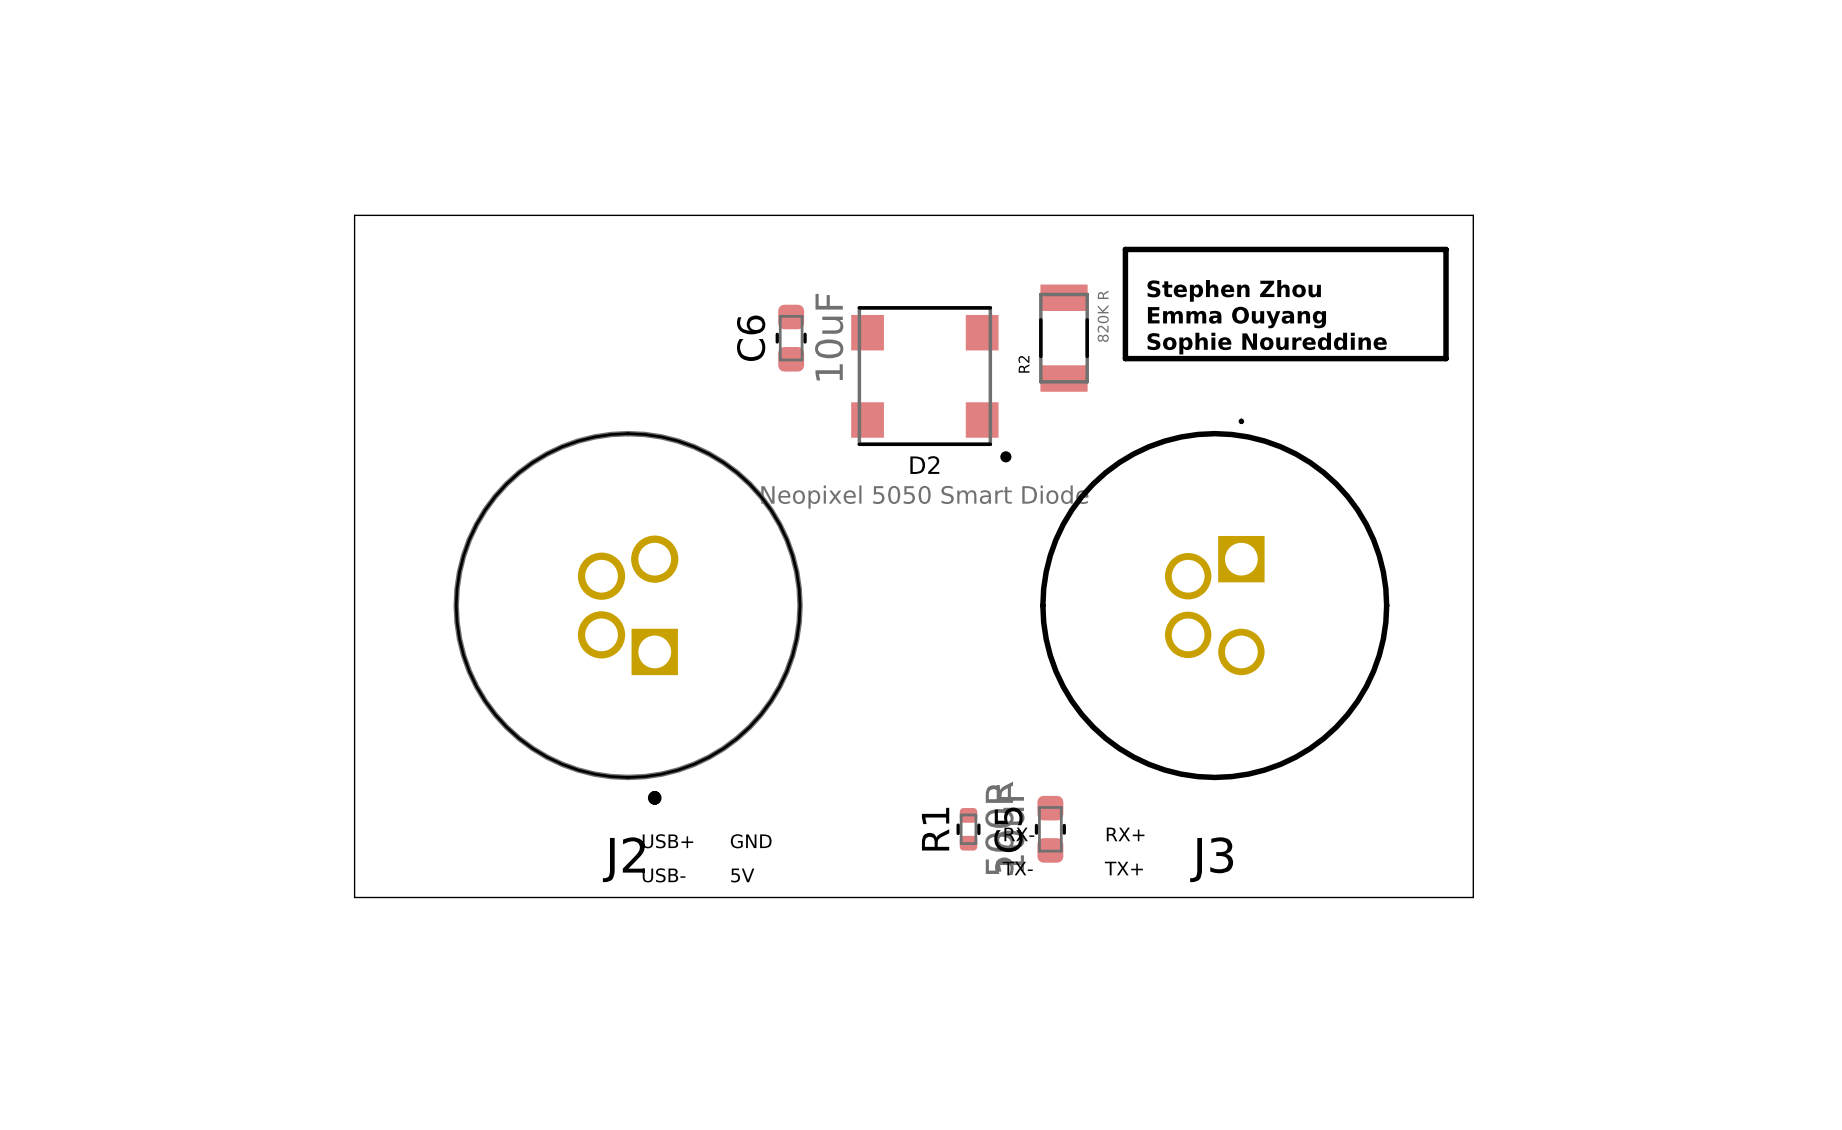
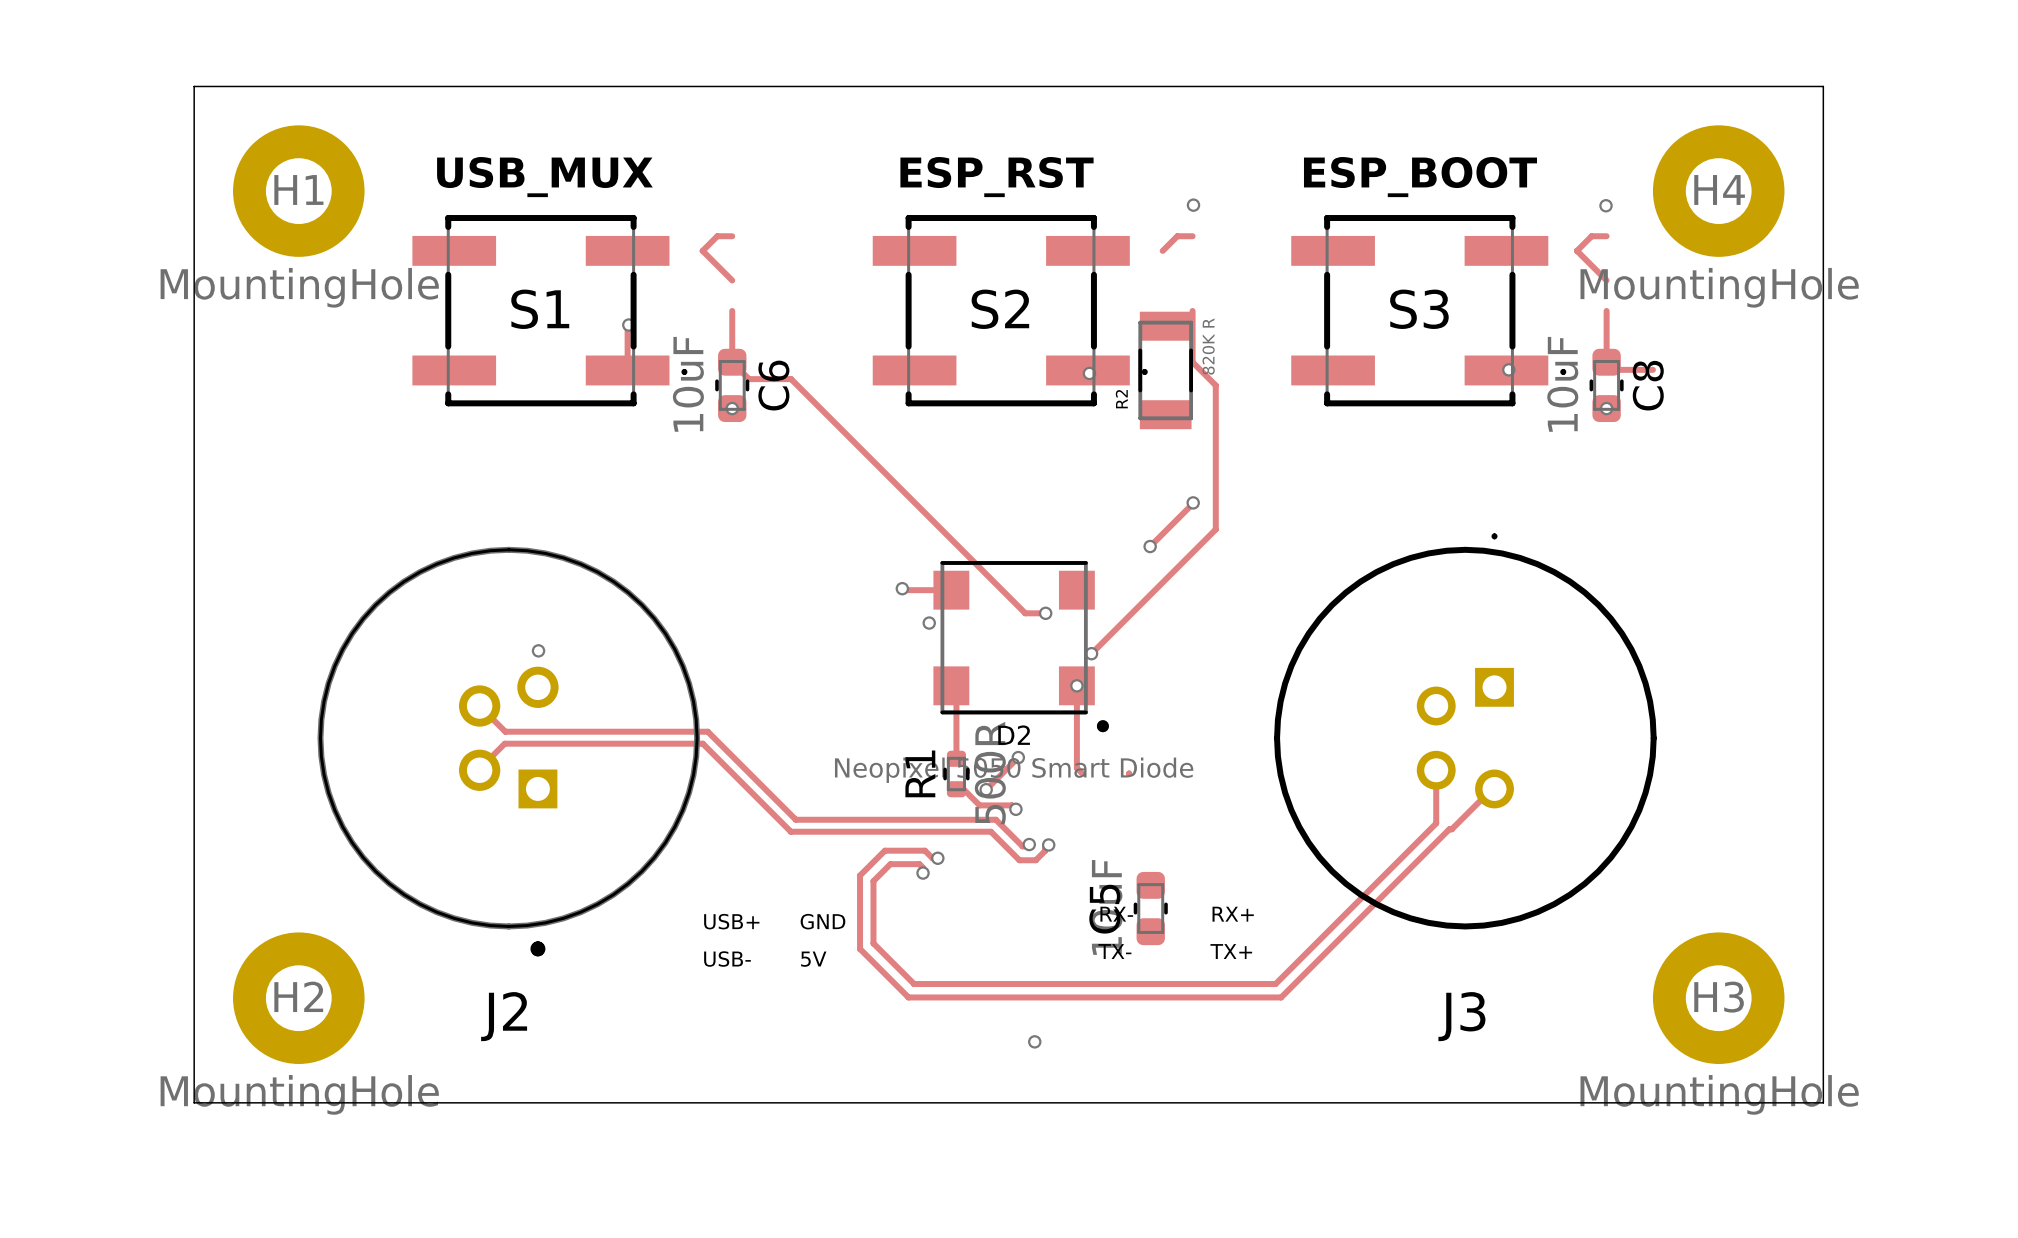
text: none -> USB_MUX (544, 177)
text: none -> ESP_RST (997, 177)
text: none -> ESP_BOOT (1420, 177)
H1: none -> MountingHole (298, 191)
H4: none -> MountingHole (1718, 191)
via: none -> (1193, 205)
via: none -> (1606, 205)
board edge: (354, 215) (1473, 215) (1473, 897) (354, 897) (354, 215) -> (194, 86) (194, 1102) (1823, 1102) (1823, 86) (194, 86)
track: none -> (732, 236) (717, 236) (702, 250) (732, 280)
track: none -> (1192, 236) (1177, 236) (1162, 250)
track: none -> (1606, 236) (1591, 236) (1577, 250) (1606, 280)
line: (1125, 249) (1446, 249) (1446, 358) (1125, 358) (1125, 249) -> none
S1: none -> (549, 310)
track: none -> (732, 310) (732, 362) (749, 379) (791, 379) (1025, 613) (1045, 613)
S2: none -> (1010, 310)
track: none -> (1192, 310) (1192, 362) (1215, 385) (1215, 529) (1091, 653)
S3: none -> (1428, 310)
track: none -> (1606, 310) (1606, 362) (1614, 369) (1652, 369)
text: Stephen Zhou (1234, 290) -> none
track: none -> (628, 325) (627, 370)
via: none -> (628, 325)
text: Emma Ouyang (1236, 317) -> none
C6 value position: 10uF (829, 337) -> 10uF (688, 384)
via: none -> (1508, 369)
C6 name position: C6 (751, 338) -> C6 (773, 385)
C6 position: (791, 338) -> (732, 385)
via: none -> (1089, 373)
text: Sophie Noureddine (1267, 343) -> none
C8: none -> 10uF (1606, 385)
via: none -> (732, 408)
via: none -> (1606, 408)
D2 position: (931, 384) -> (1021, 646)
J3 footprint: [1040, 418, 1390, 781] -> [1274, 533, 1657, 930]
J2 footprint: [453, 430, 803, 805] -> [317, 546, 701, 957]
track: none -> (1193, 503) (1150, 546)
via: none -> (1193, 502)
via: none -> (1150, 546)
track: none -> (902, 588) (951, 590)
via: none -> (902, 588)
via: none -> (1045, 613)
via: none -> (929, 623)
via: none -> (538, 650)
via: none -> (1091, 653)
track: none -> (951, 685) (956, 690) (956, 758)
track: none -> (1076, 685) (1076, 768) (1082, 774)
via: none -> (1076, 685)
track: none -> (479, 706) (505, 731) (707, 731) (795, 819) (995, 819) (1022, 846) (1029, 844)
track: none -> (1018, 757) (986, 789)
via: none -> (1018, 757)
track: none -> (479, 770) (504, 743) (702, 743) (790, 831) (990, 831) (1019, 860) (1035, 860) (1048, 844)
track: none -> (1436, 770) (1436, 823) (1275, 984) (914, 984) (873, 943) (873, 881) (890, 864) (919, 864) (923, 867) (923, 873)
track: none -> (956, 789) (963, 789) (979, 805) (1012, 805) (1015, 809)
via: none -> (986, 789)
track: none -> (1494, 788) (1492, 788) (1451, 829) (1449, 829) (1281, 997) (908, 997) (860, 948) (860, 875) (884, 850) (924, 850) (932, 858) (937, 858)
via: none -> (1015, 809)
via: none -> (1029, 844)
via: none -> (1048, 844)
via: none -> (937, 858)
via: none -> (923, 873)
R1 position: (968, 829) -> (956, 774)
H2: none -> MountingHole (298, 998)
H3: none -> MountingHole (1718, 998)
via: none -> (1034, 1041)

